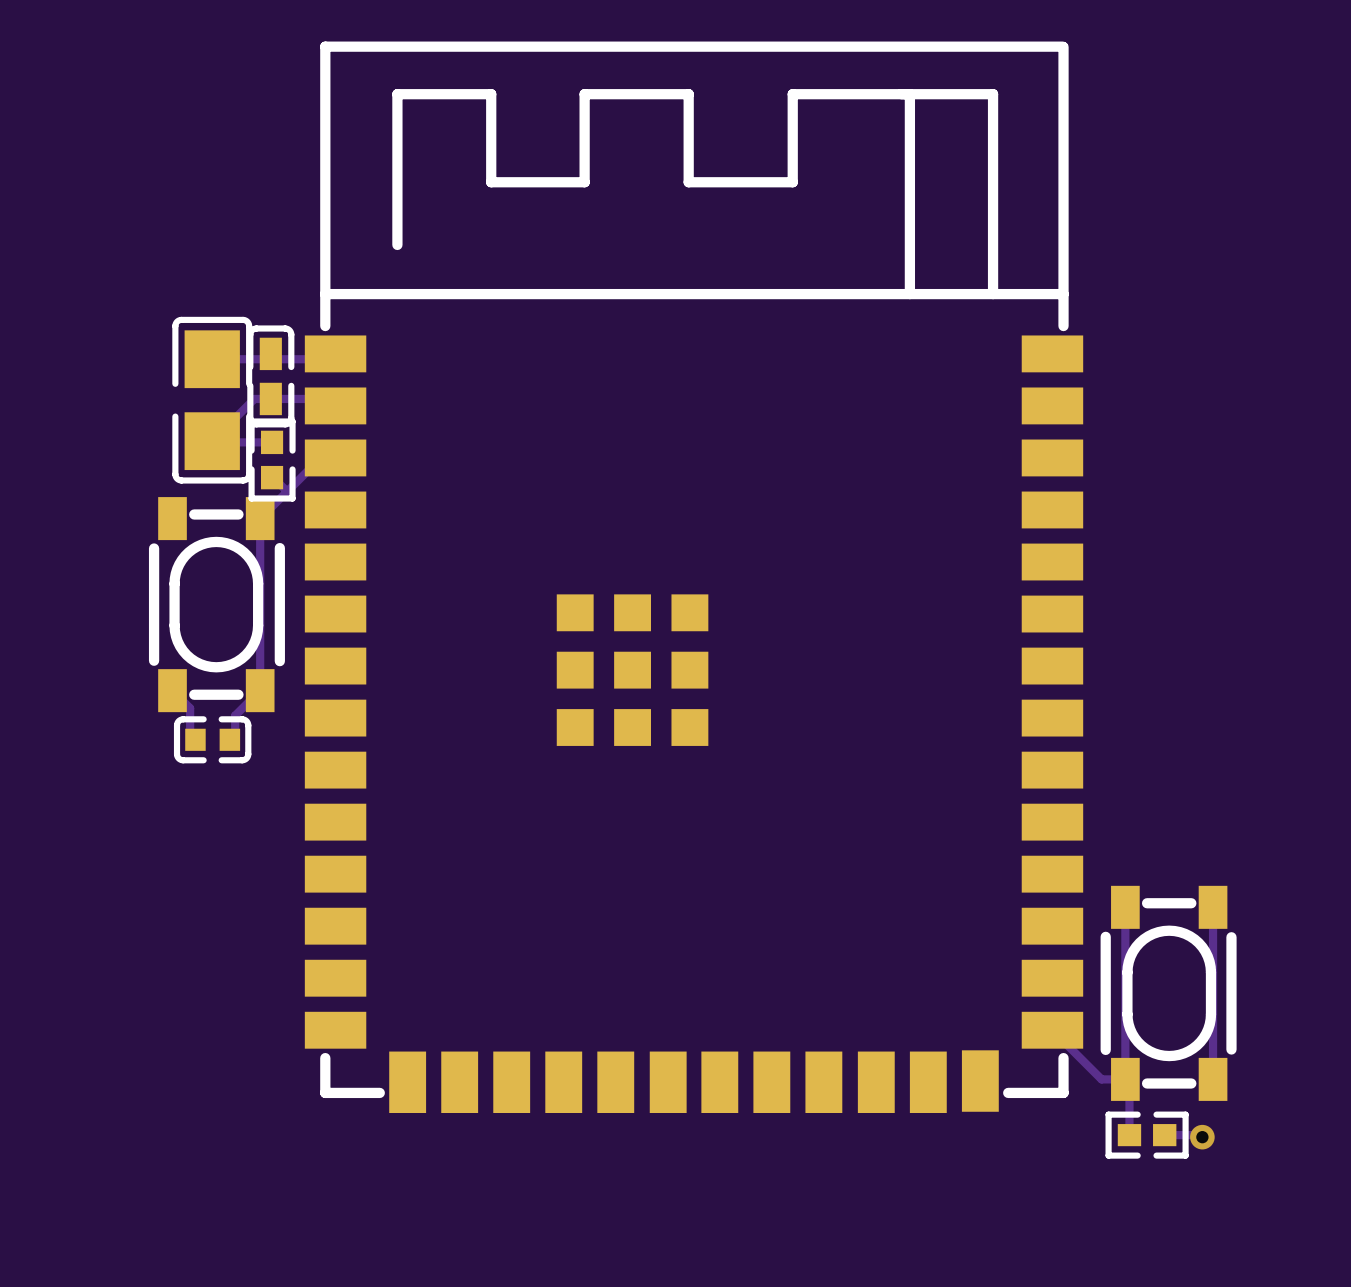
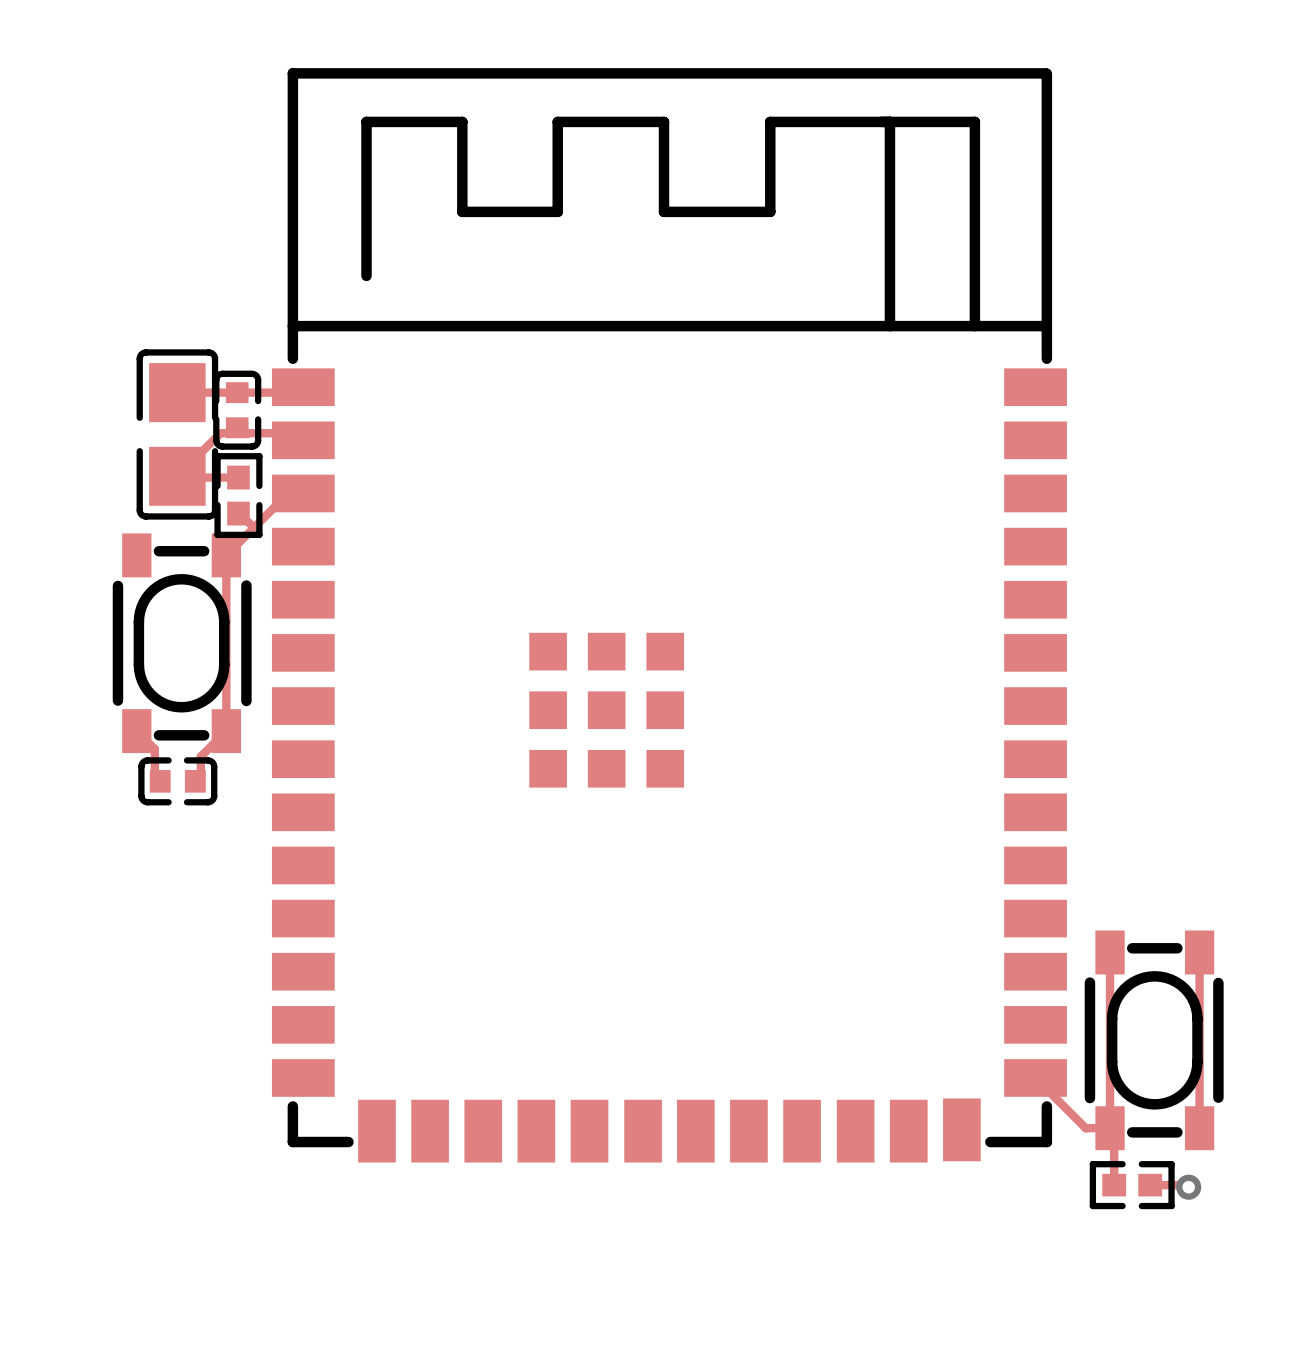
part footprint: [247, 325, 295, 428] -> [213, 370, 262, 450]

